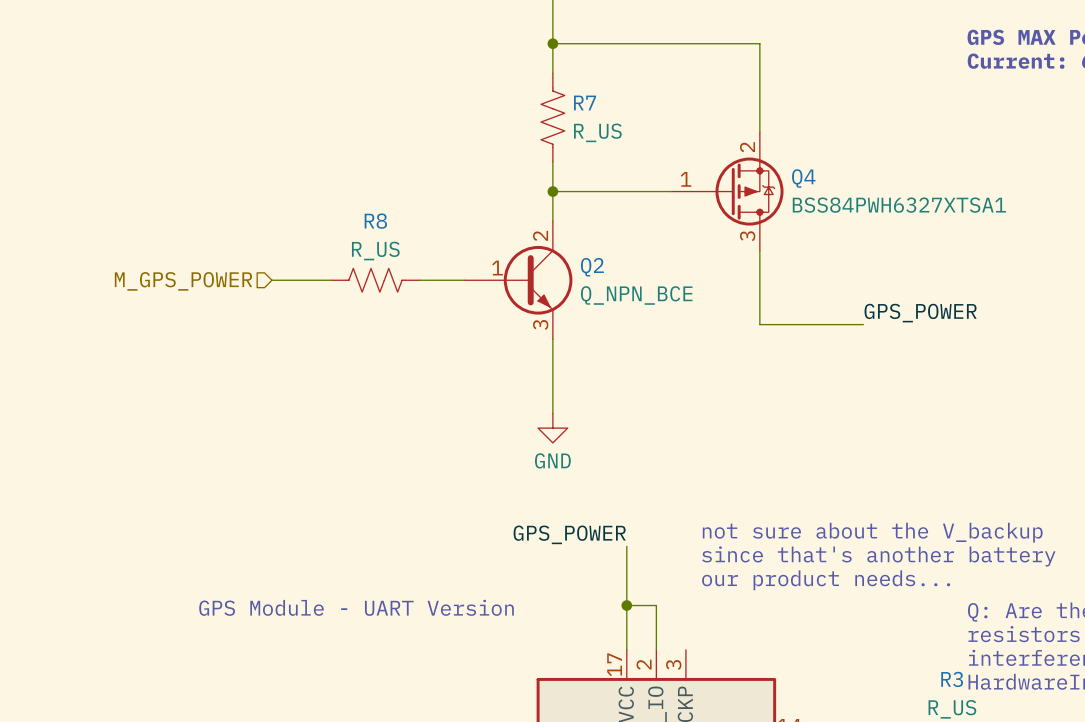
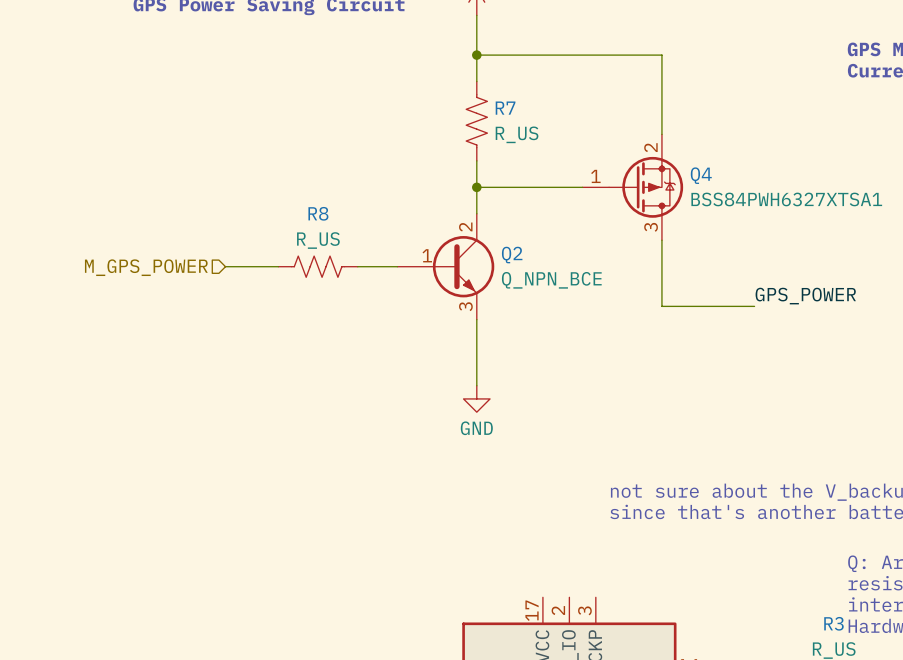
label: GPS_POWER (569, 534) -> none
wire: (626, 546) (626, 649) -> none
text: our product needs... (826, 580) -> none
wire: (626, 605) (656, 605) (656, 649) -> none
junction: (626, 605) -> none
text: GPS Module - UART Version (356, 607) -> none

